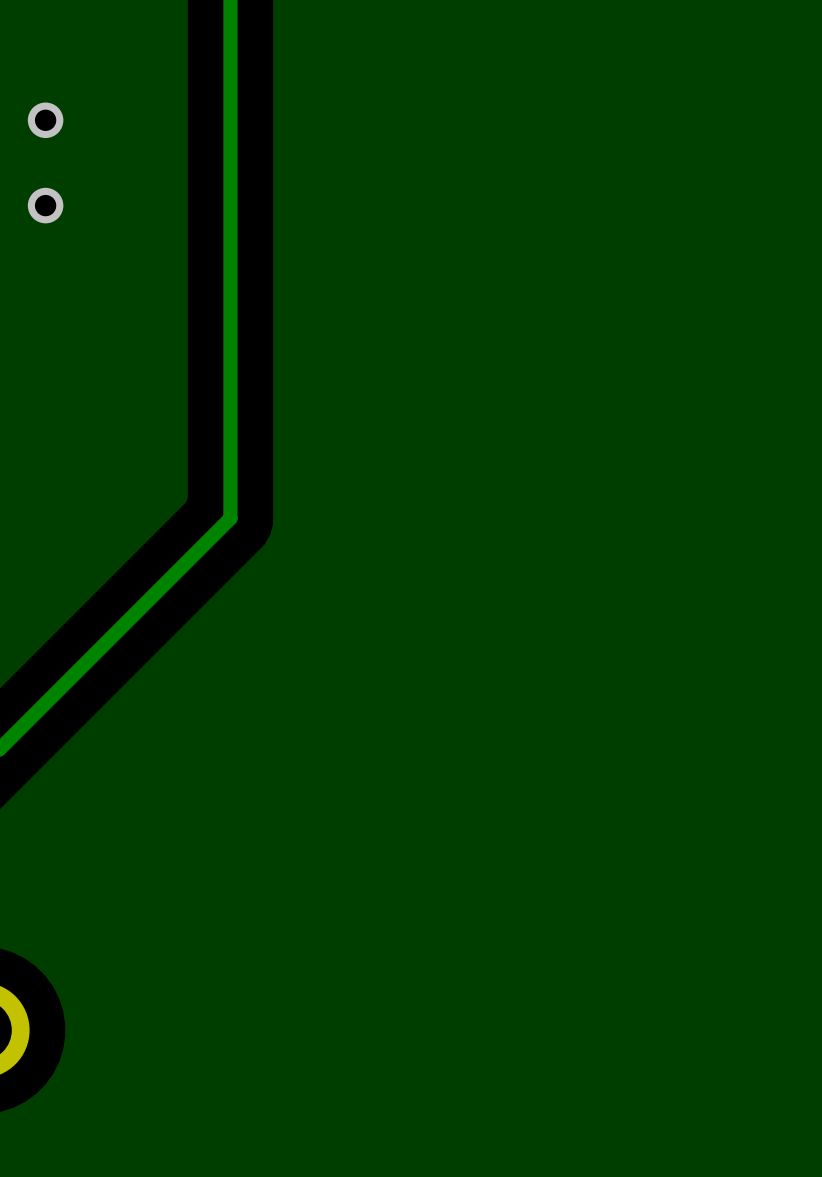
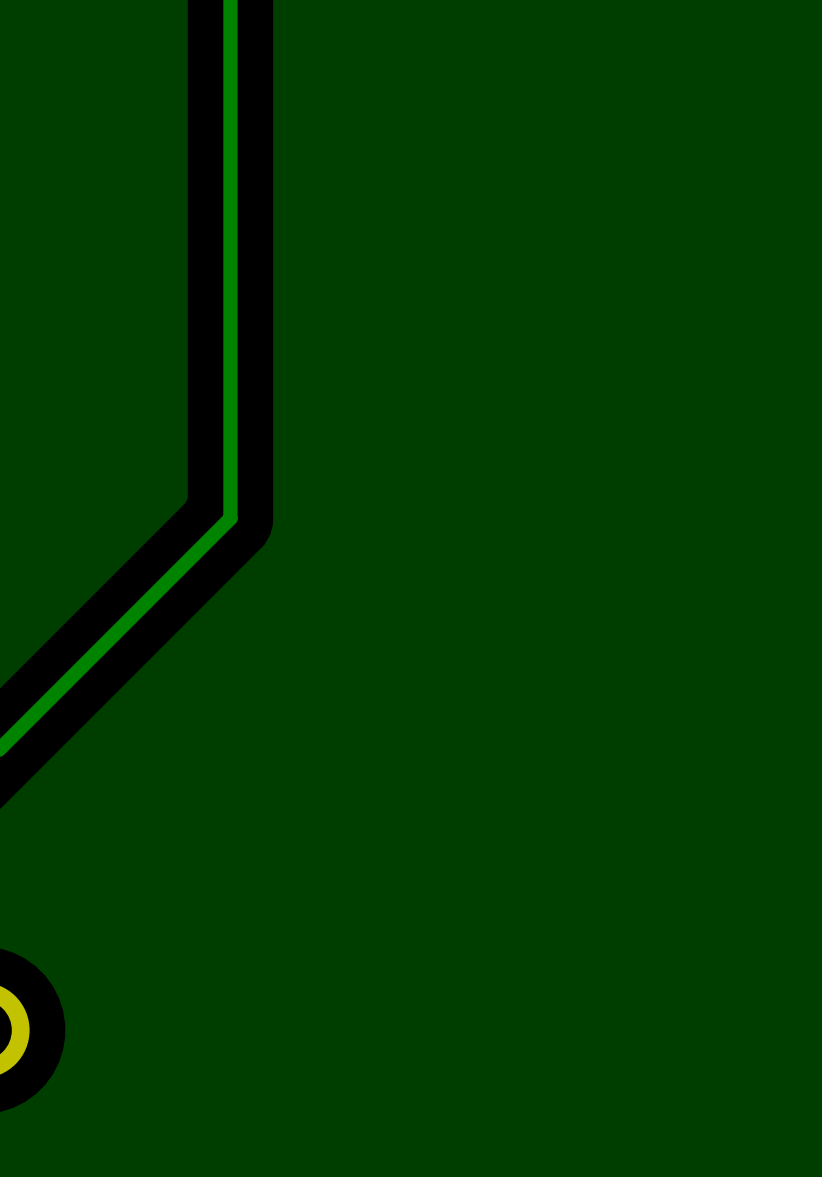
via: (45, 120) -> none
via: (45, 205) -> none

